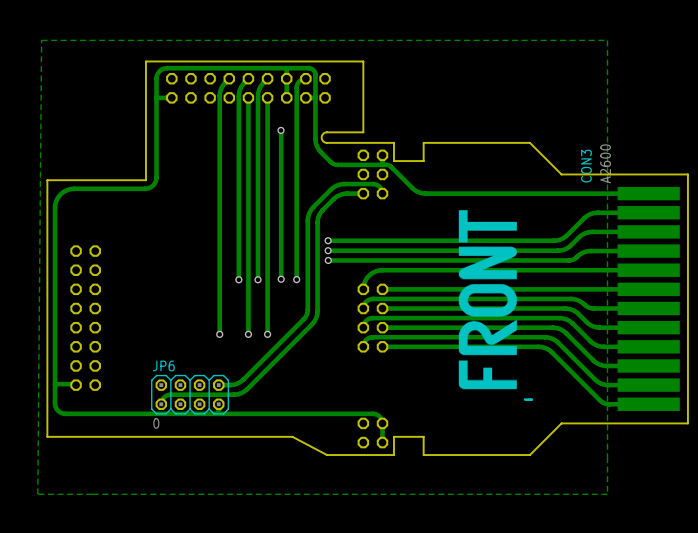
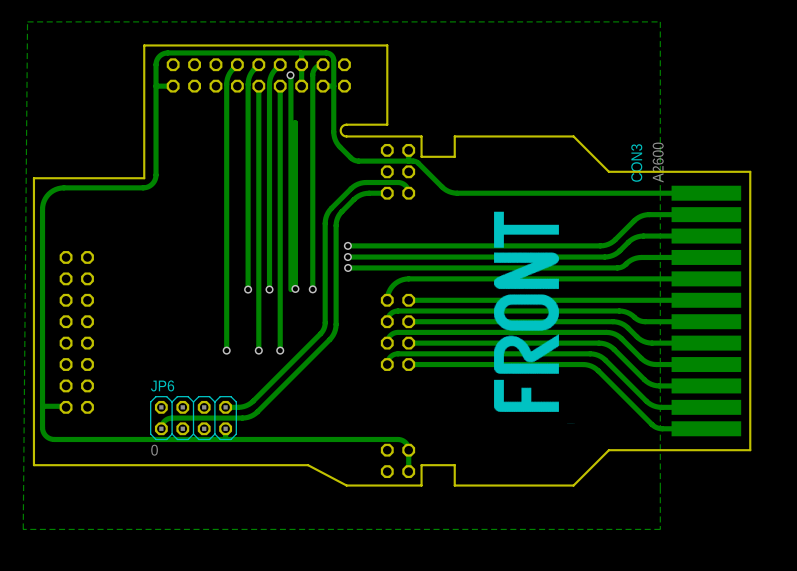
track: none -> (290, 75) (290, 289)
via position: (280, 130) -> (290, 75)

